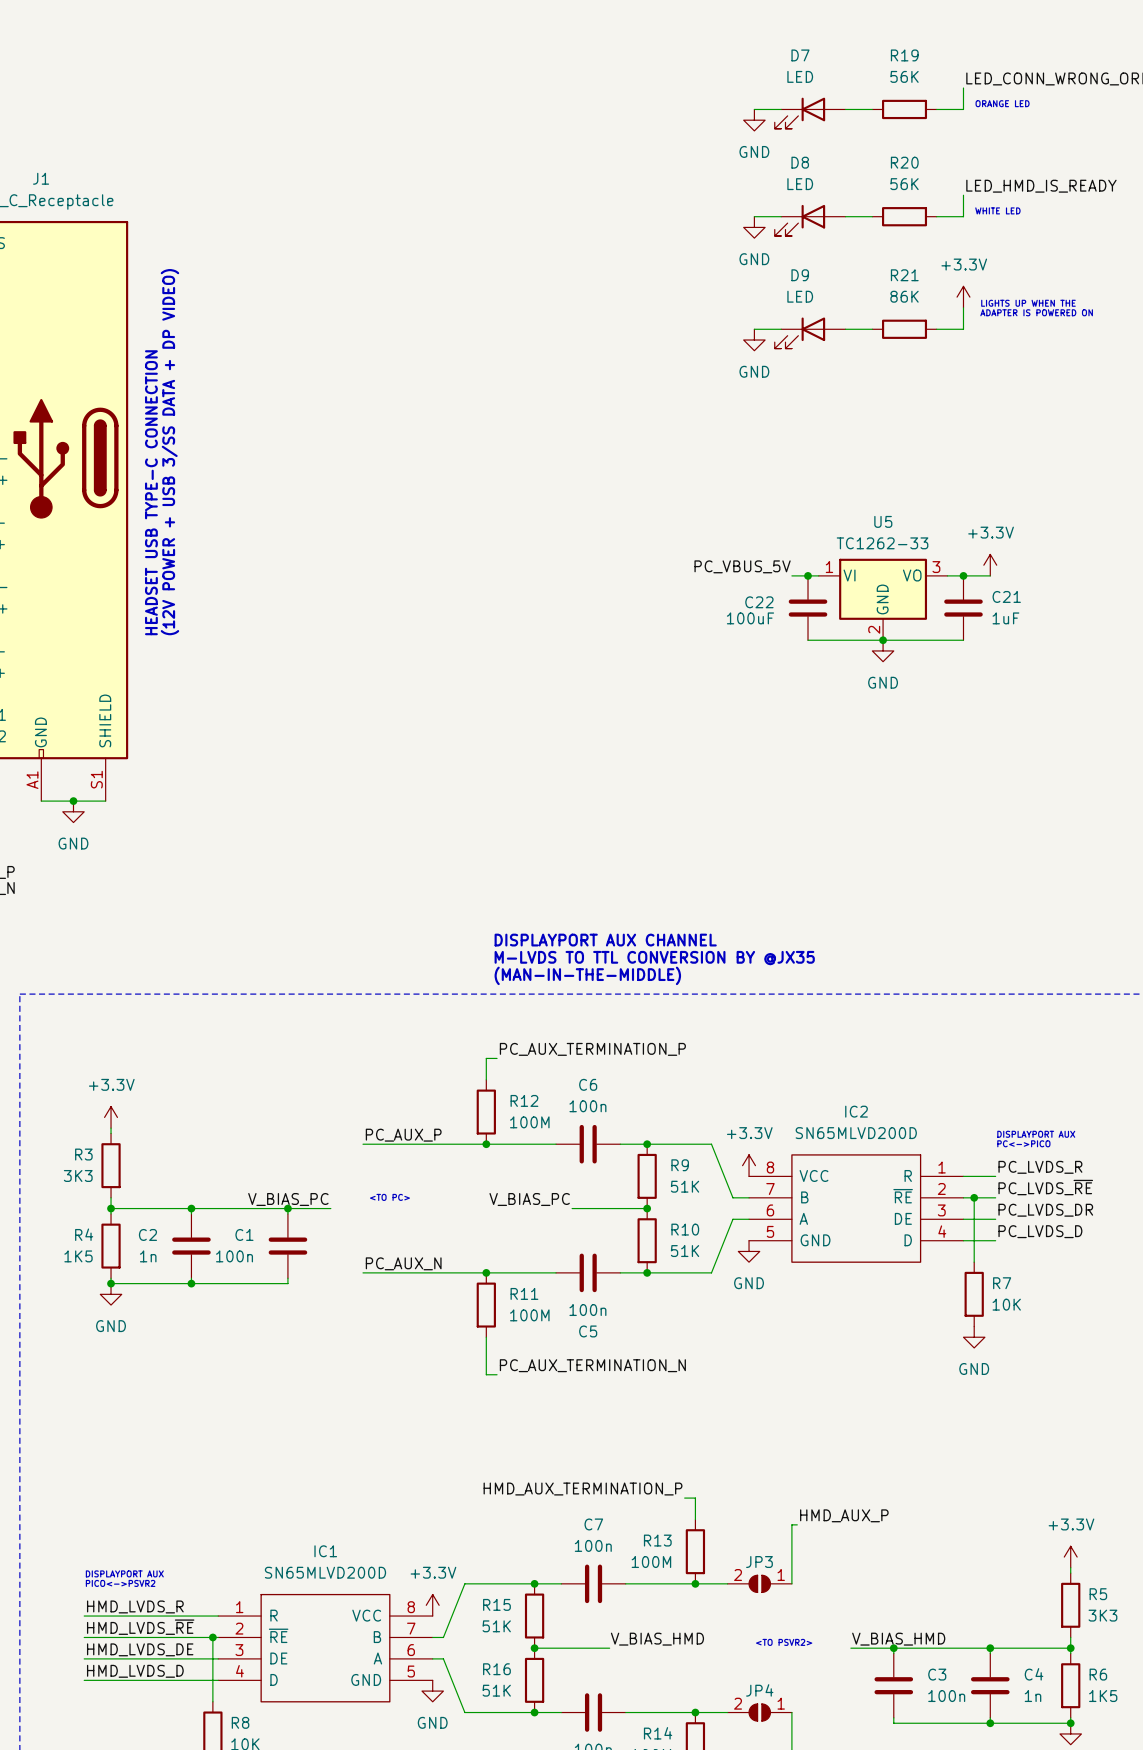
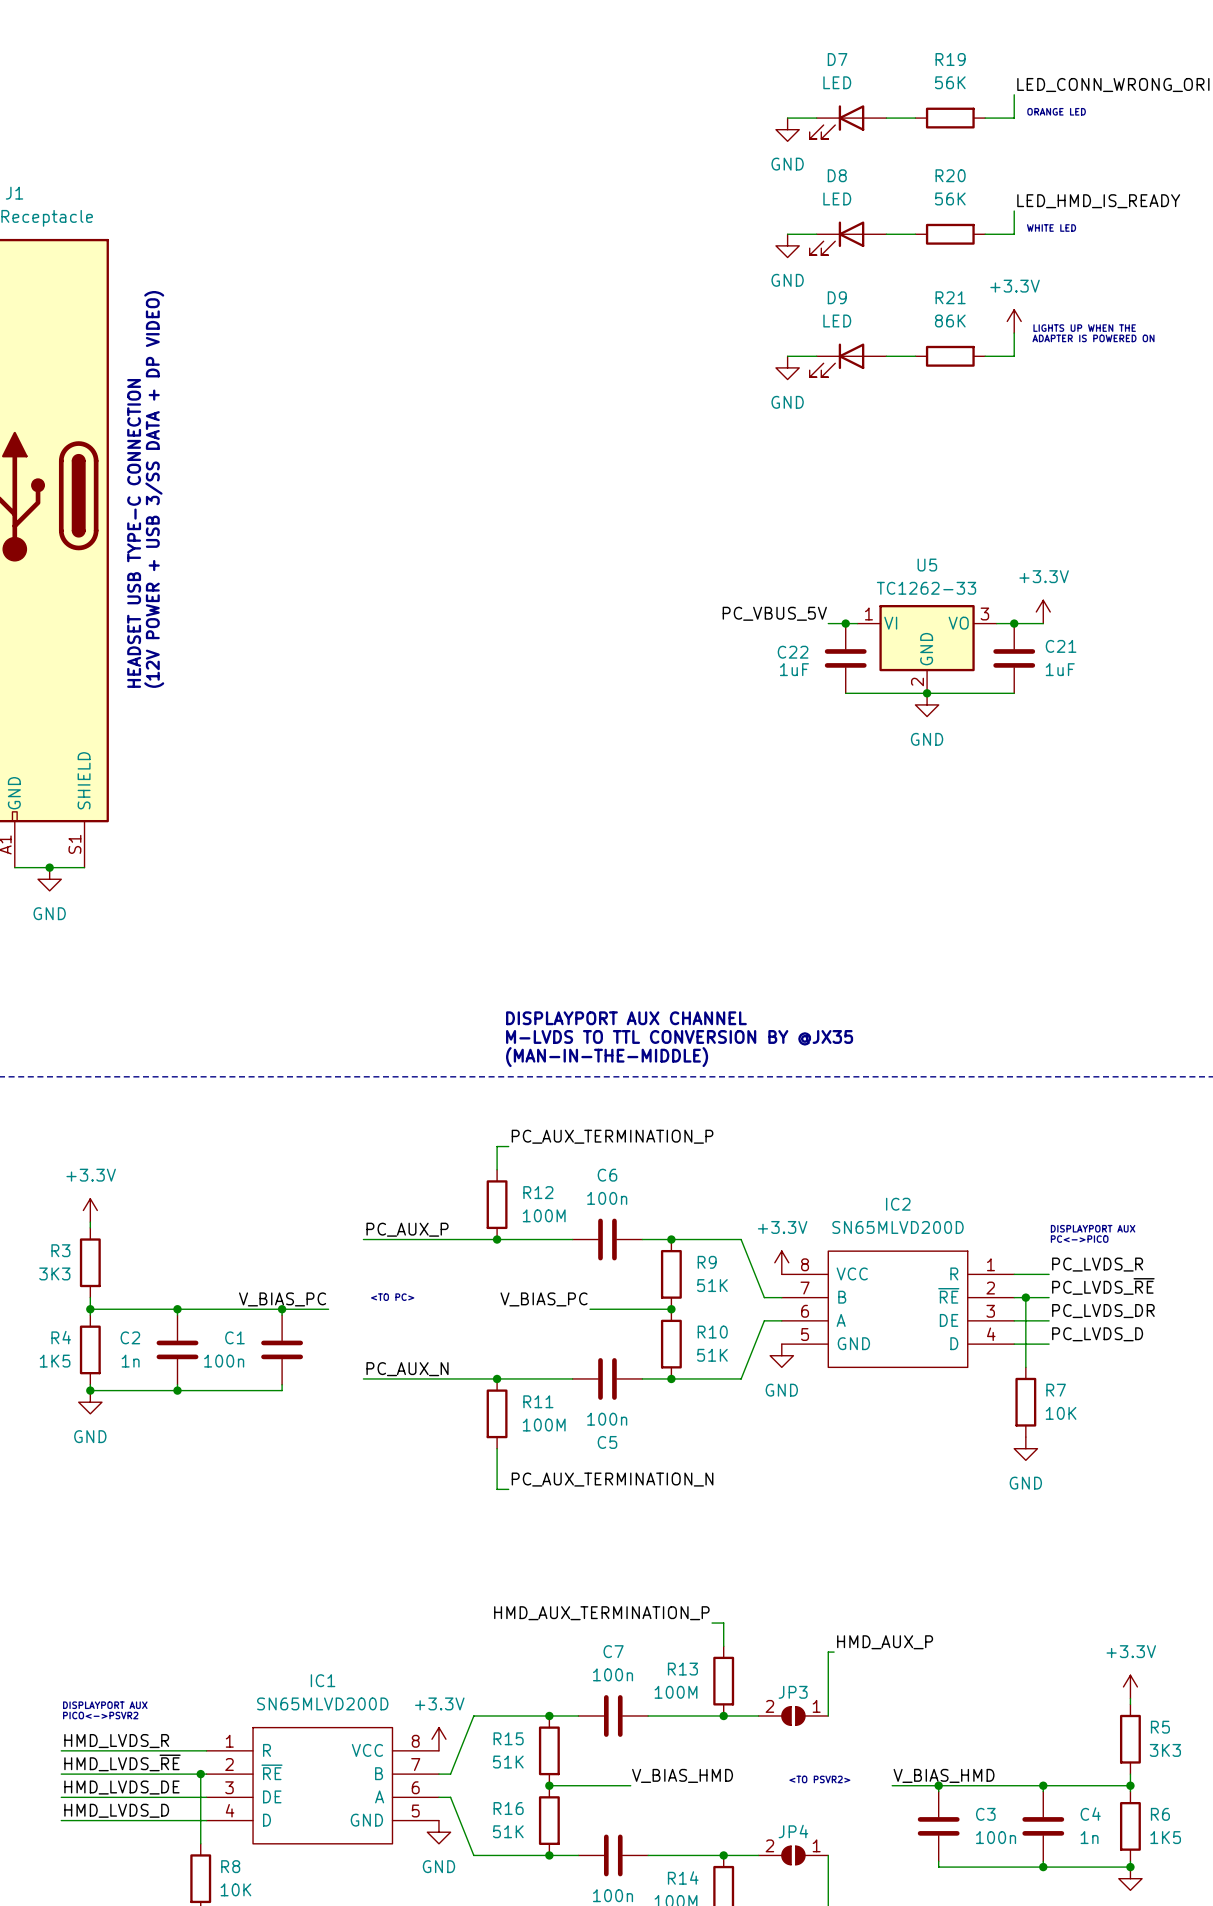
C22 value: 100uF (750, 618) -> 1uF (794, 669)

